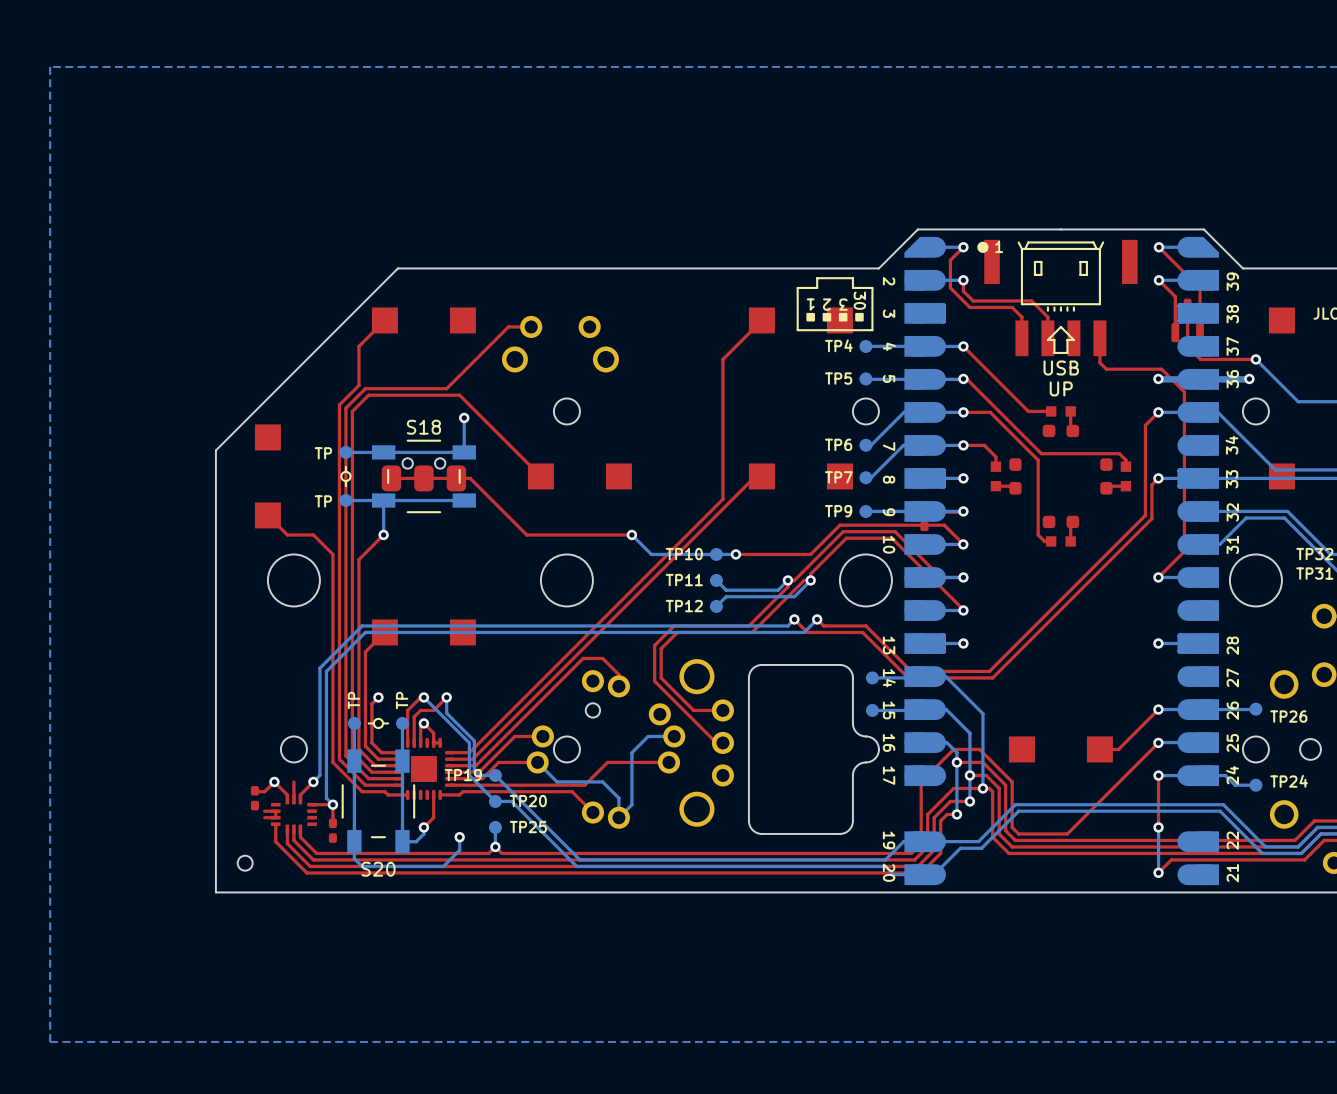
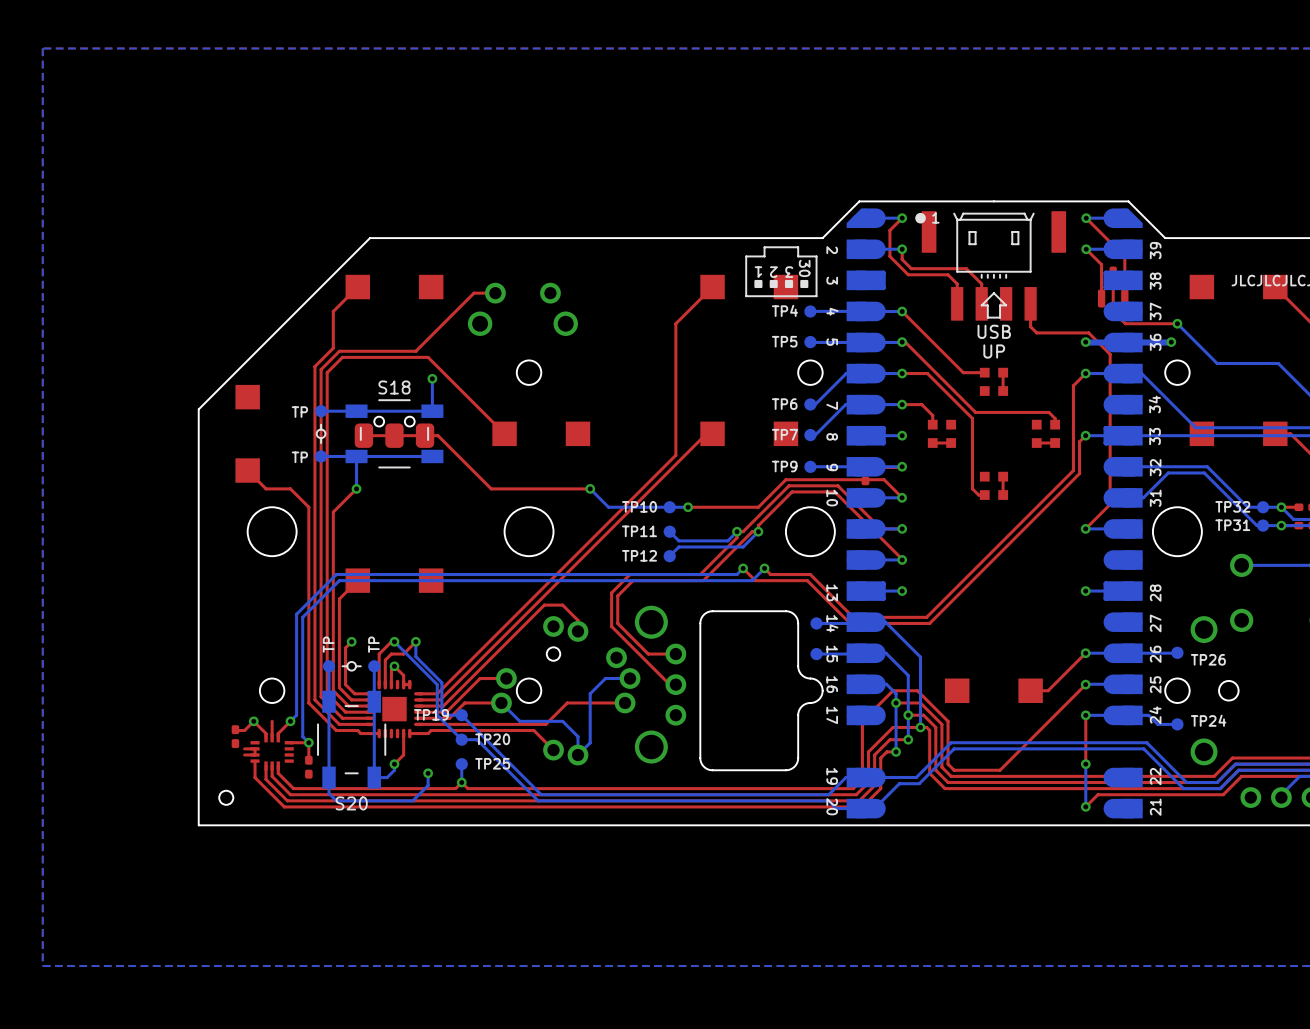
part footprint: [1042, 424, 1080, 438] -> [979, 386, 1008, 396]
part footprint: [1009, 458, 1022, 495] -> [946, 419, 957, 448]
part footprint: [1100, 458, 1113, 495] -> [1031, 419, 1042, 448]
part footprint: [1042, 515, 1080, 529] -> [979, 471, 1008, 482]

